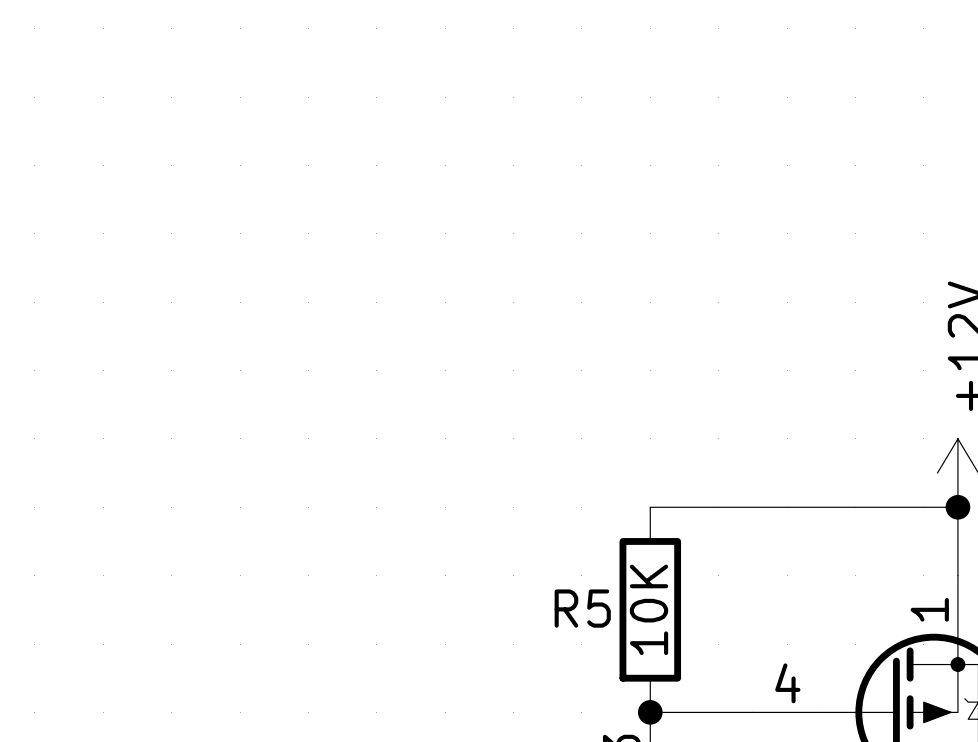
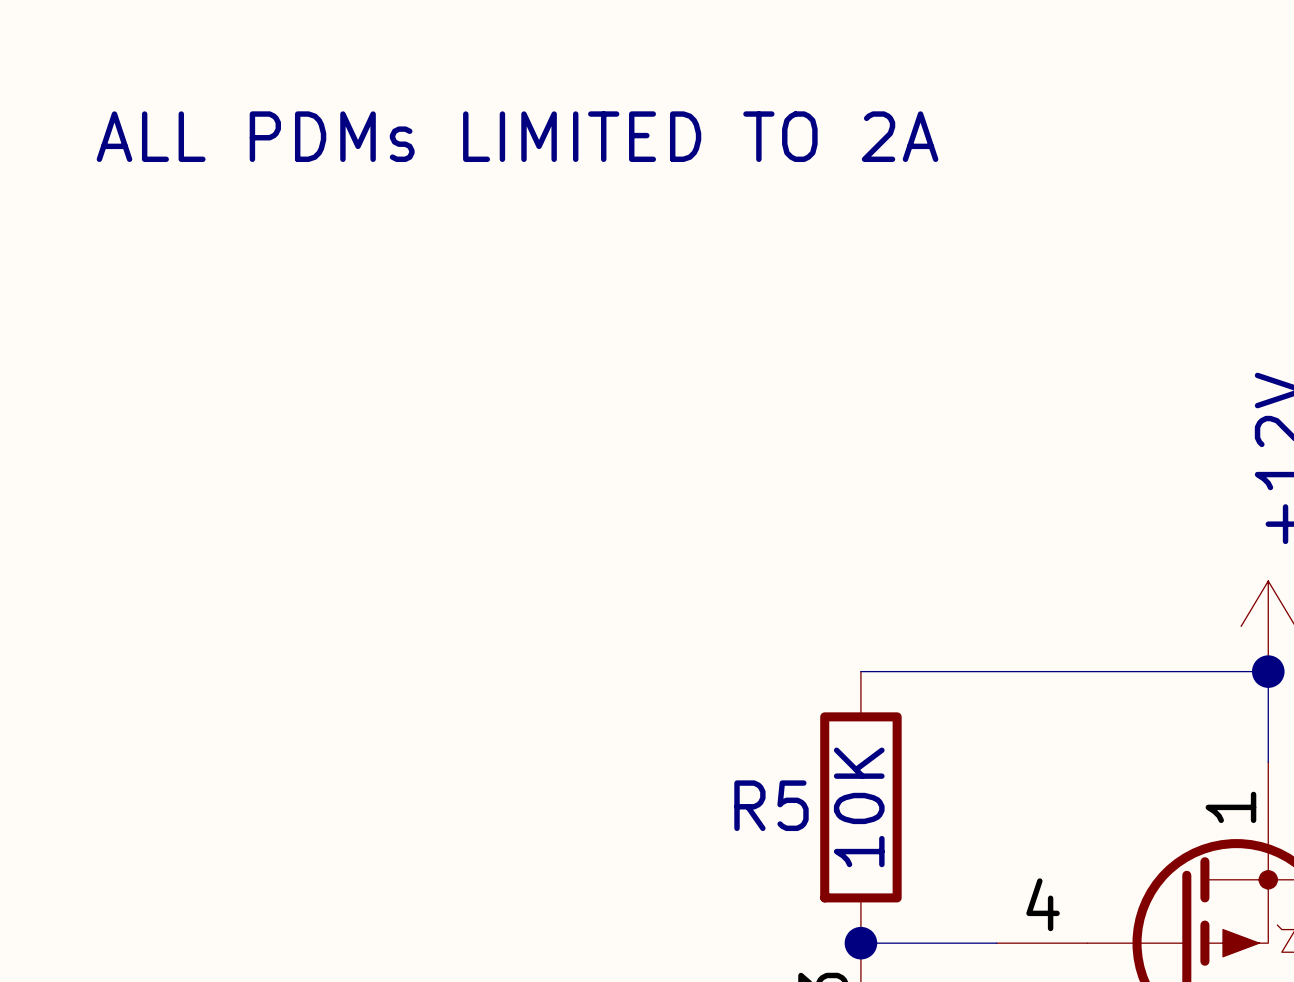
text: none -> ALL PDMs LIMITED TO 2A (517, 136)

